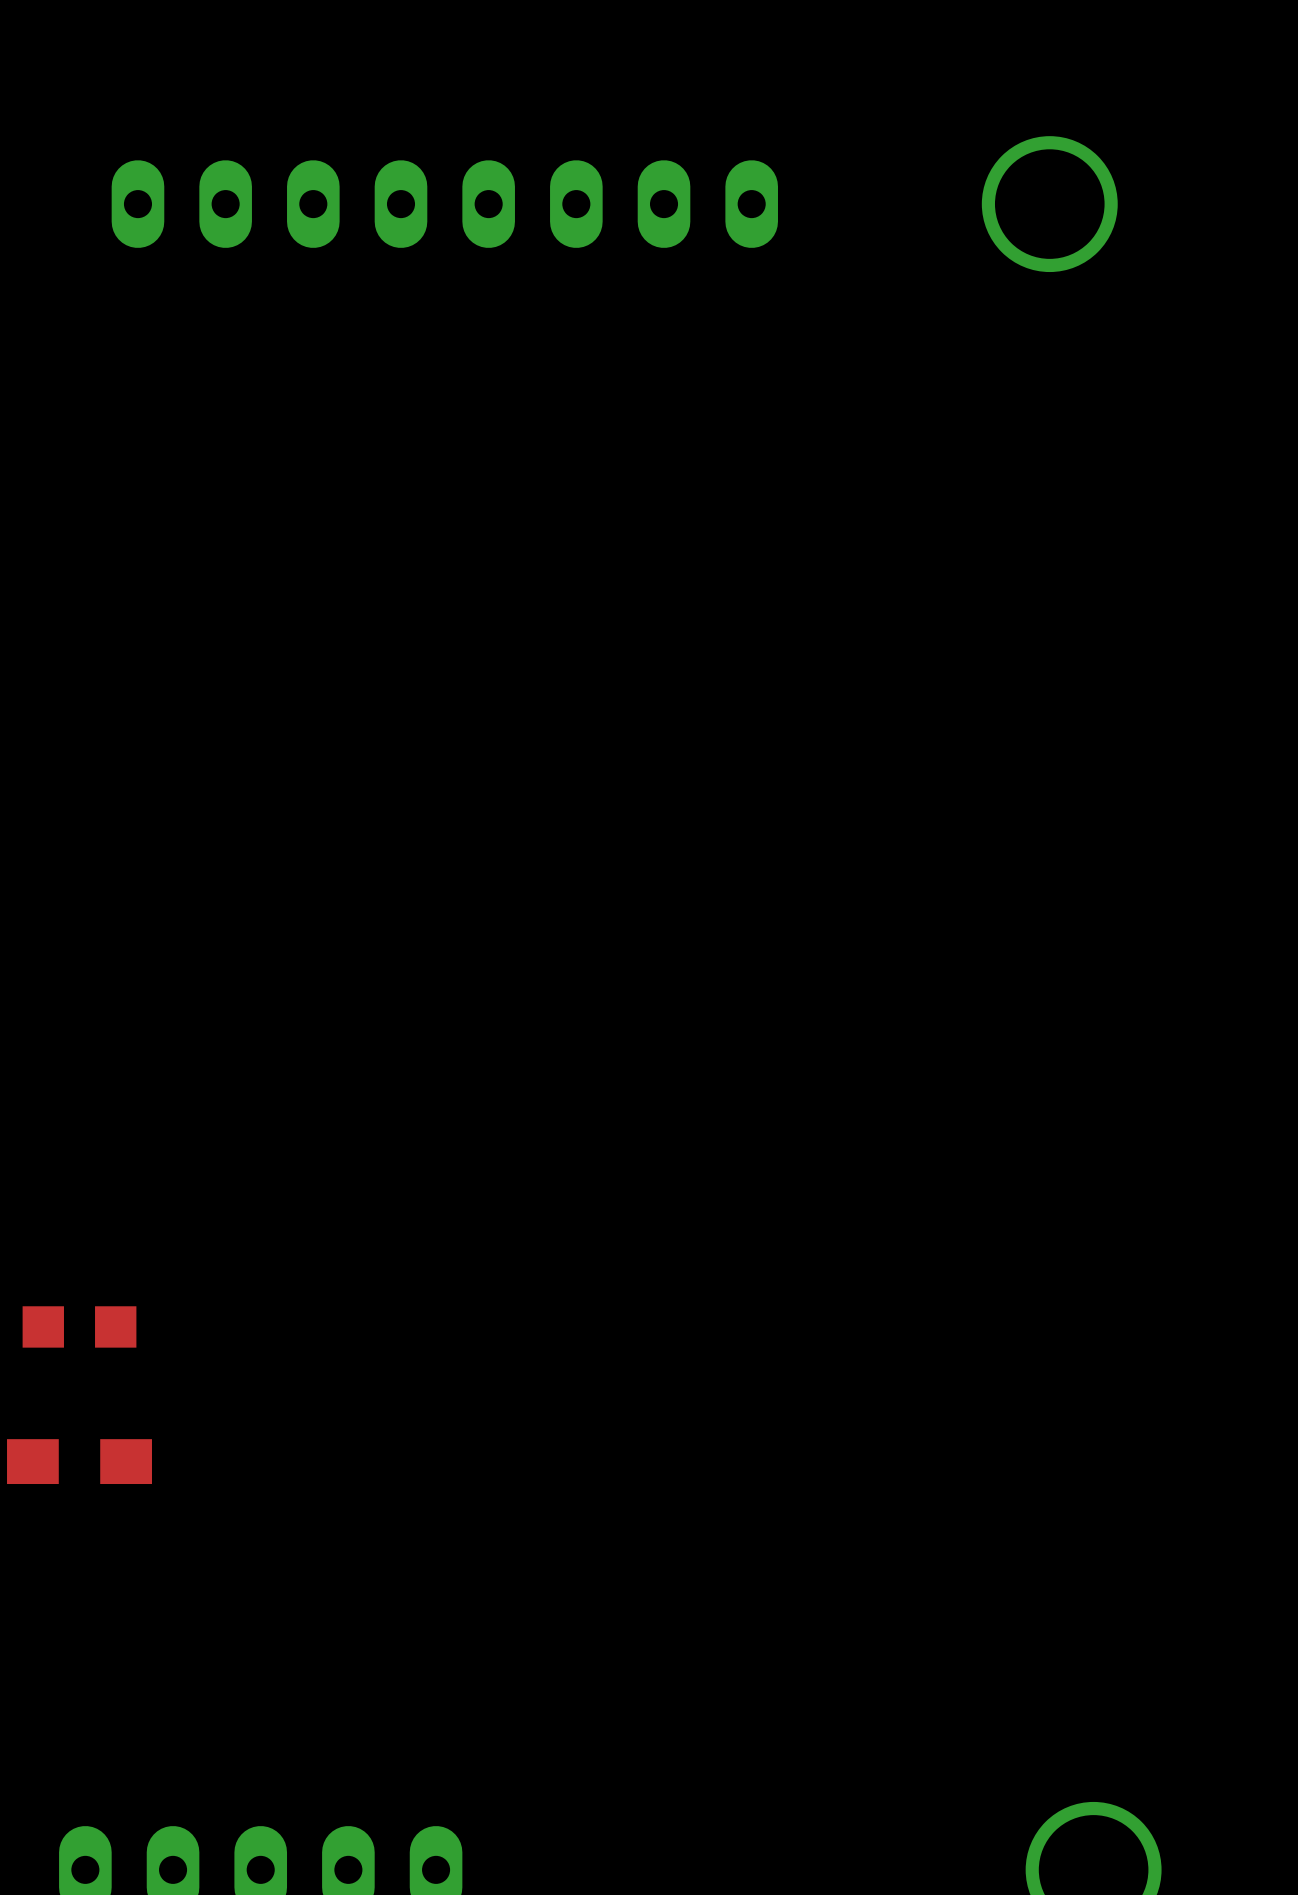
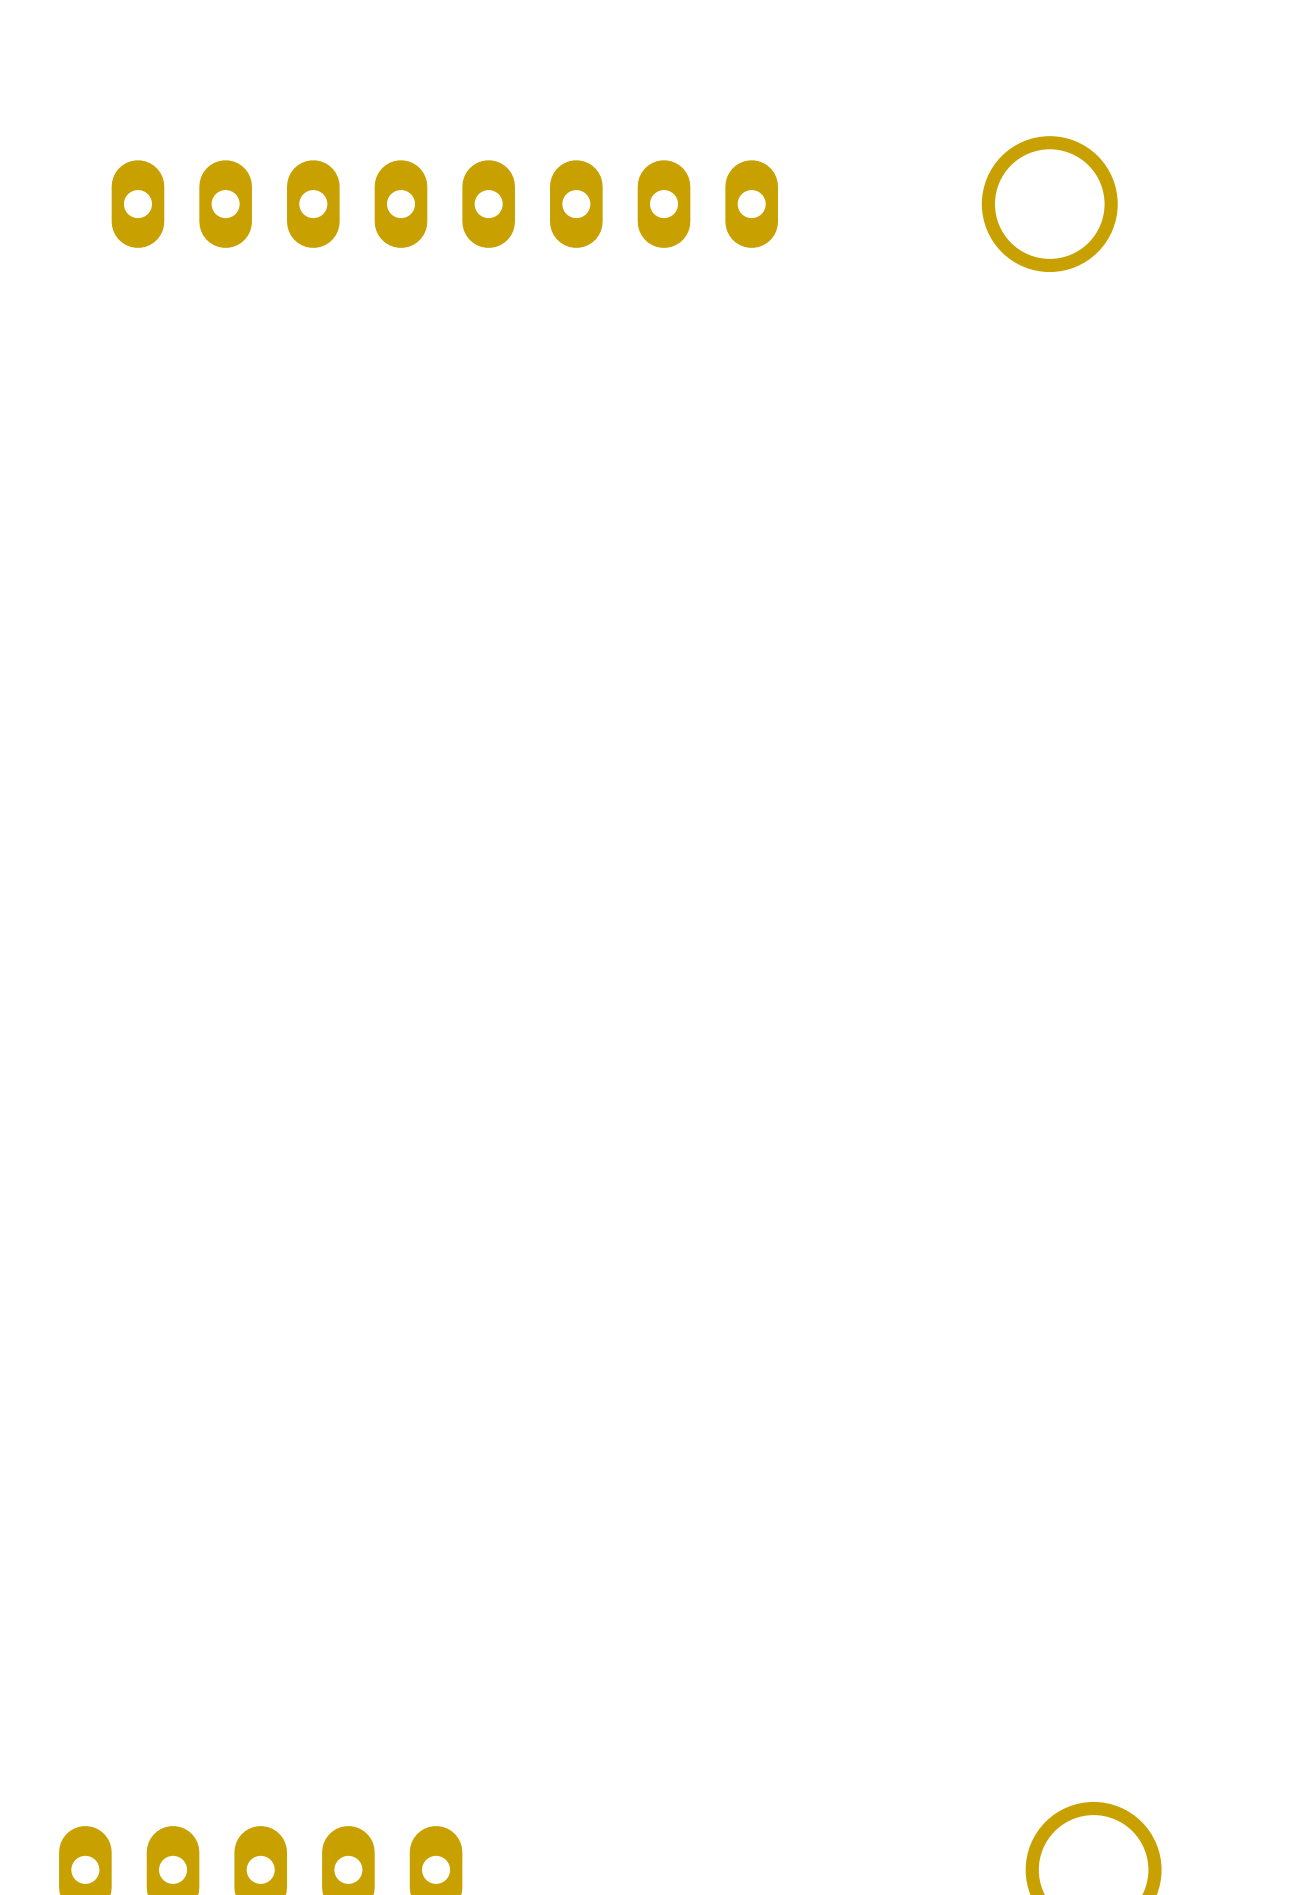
part: (79, 1326) -> none
part: (79, 1461) -> none

